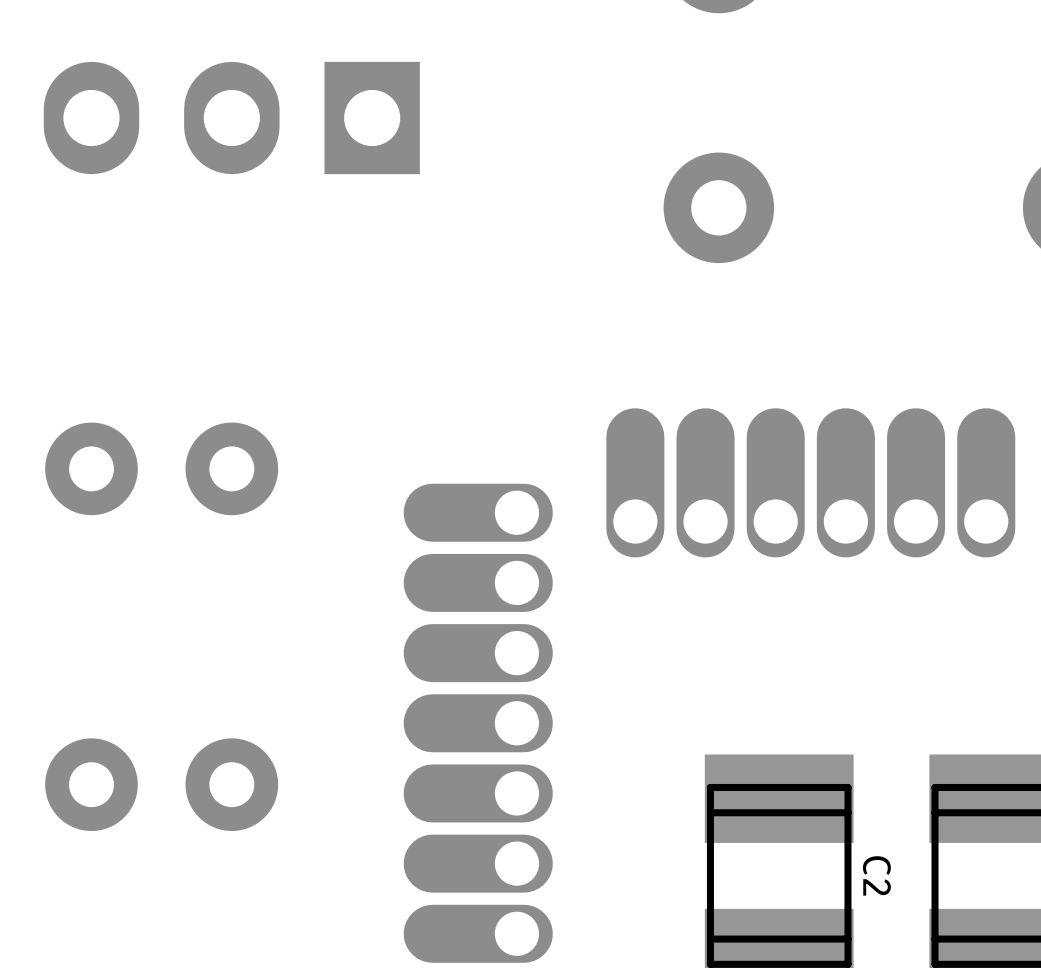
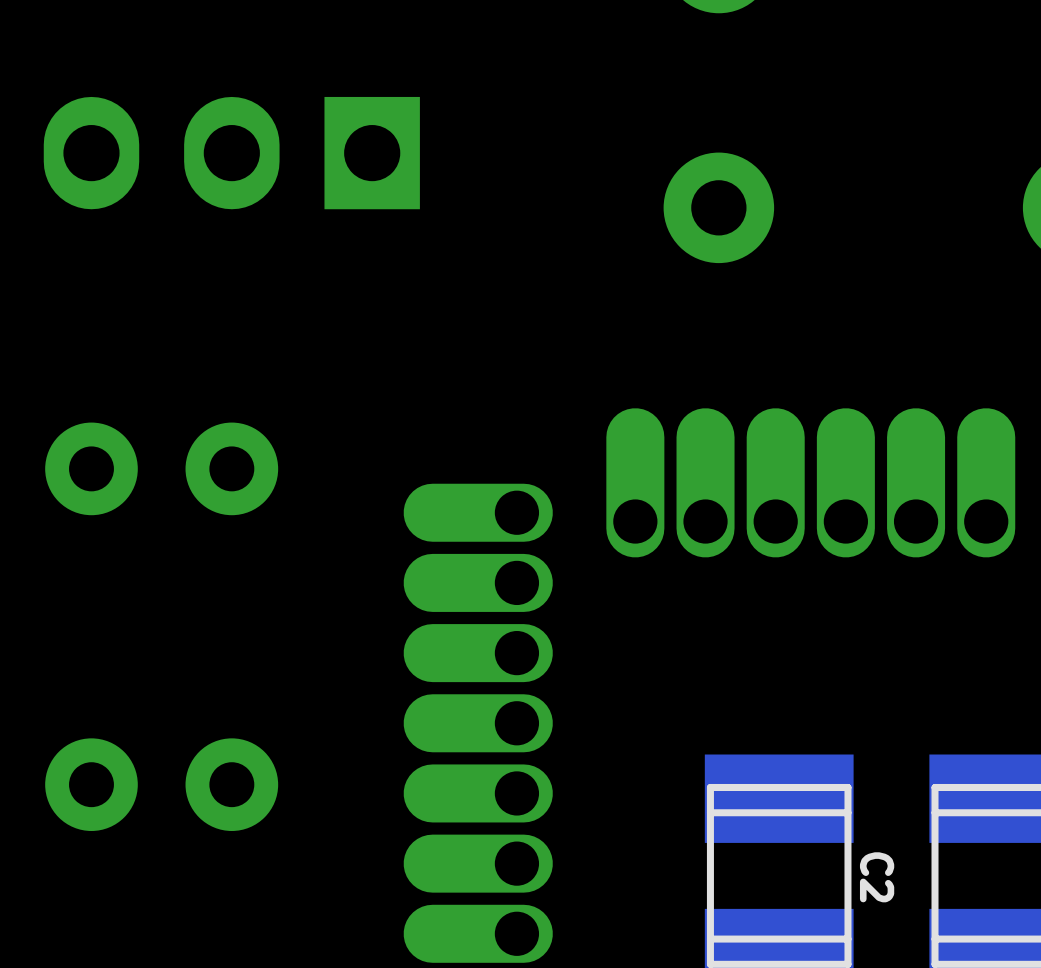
part position: (231, 118) -> (231, 153)

